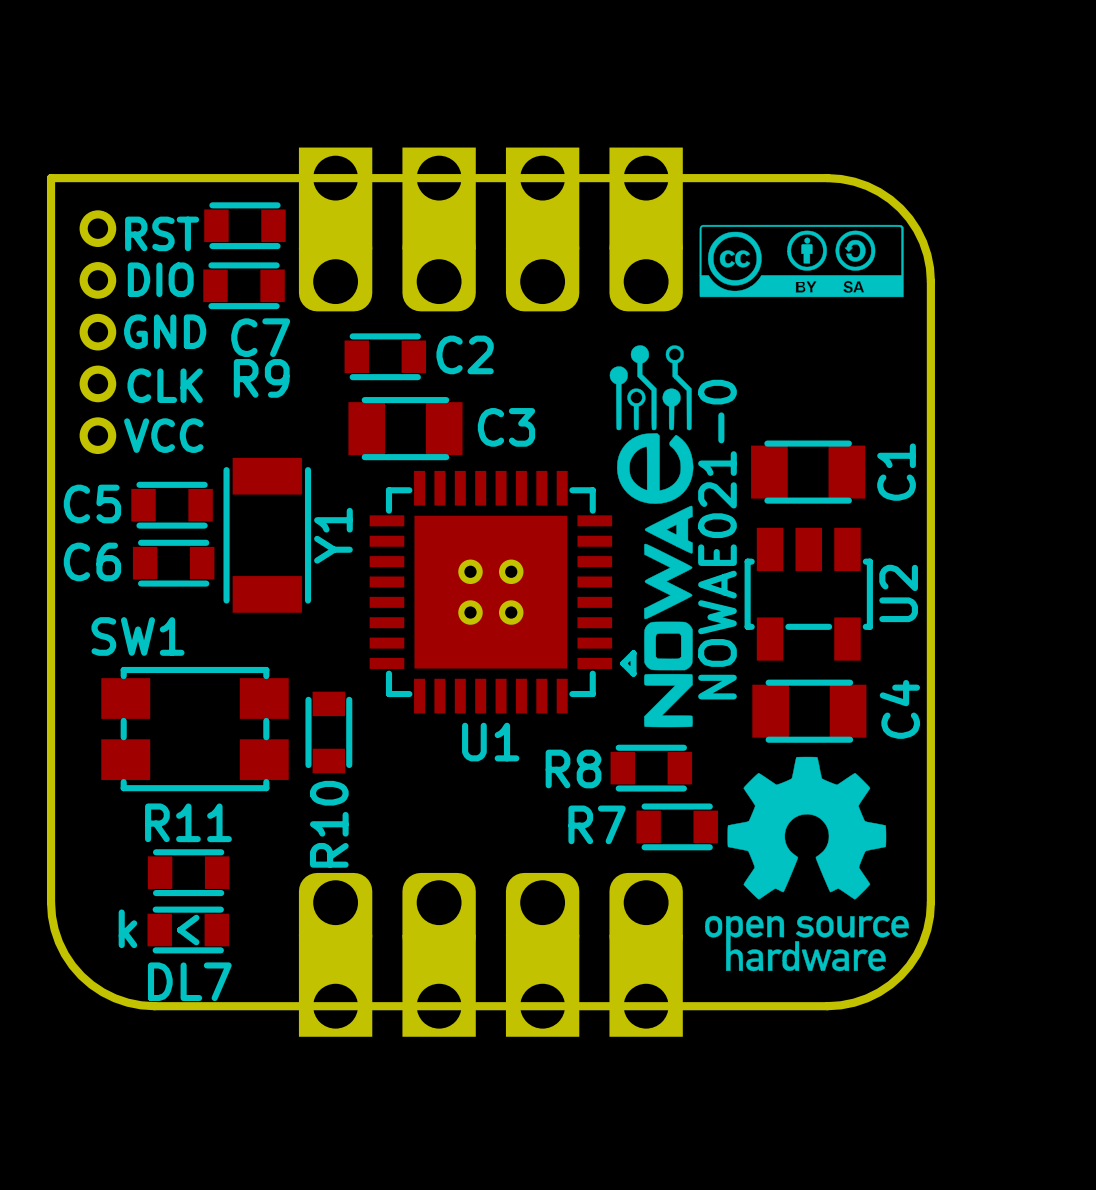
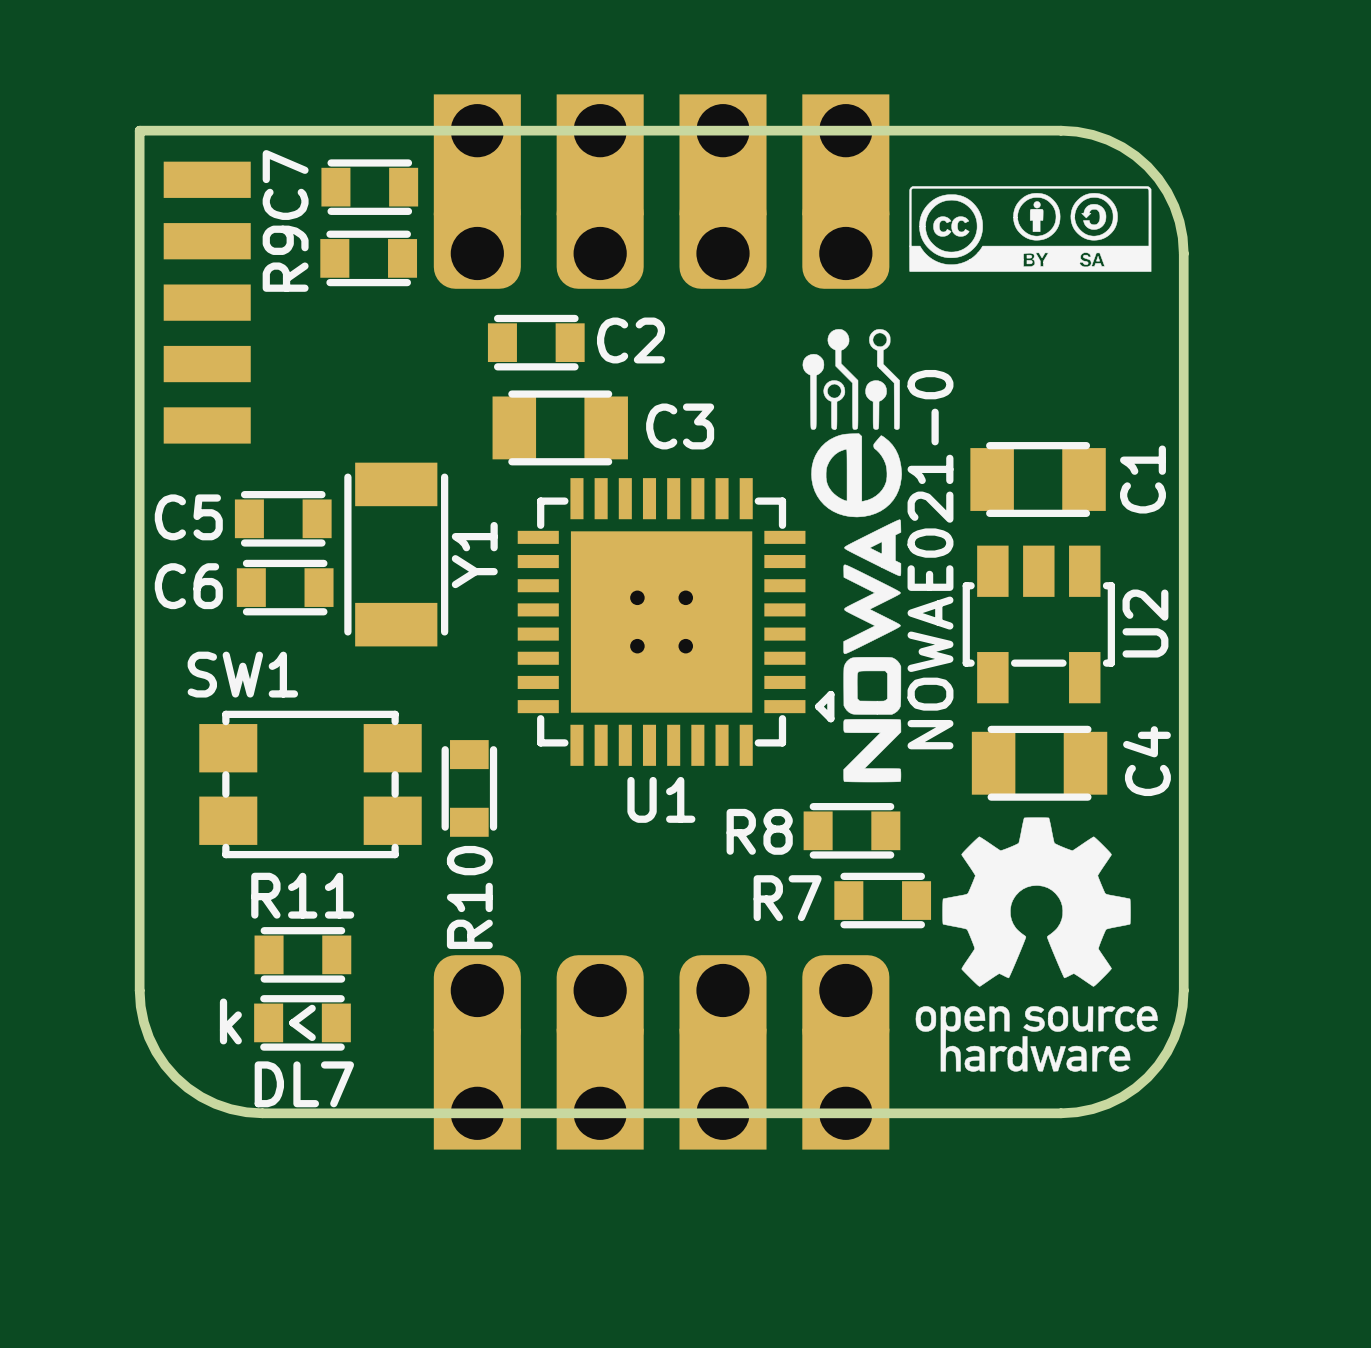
part footprint: [79, 210, 117, 455] -> [163, 161, 251, 444]
text: RST (162, 233) -> none
text: DIO (160, 279) -> none
text: GND (165, 331) -> none
C7 name rotation: 0° (260, 337) -> 90° counterclockwise (285, 185)
C7 name position: C7 (260, 337) -> C7 (285, 185)
R9 name rotation: 0° (261, 378) -> 90° counterclockwise (285, 258)
R9 name position: R9 (261, 378) -> R9 (285, 258)
text: CLK (165, 385) -> none
text: VCC (163, 435) -> none

